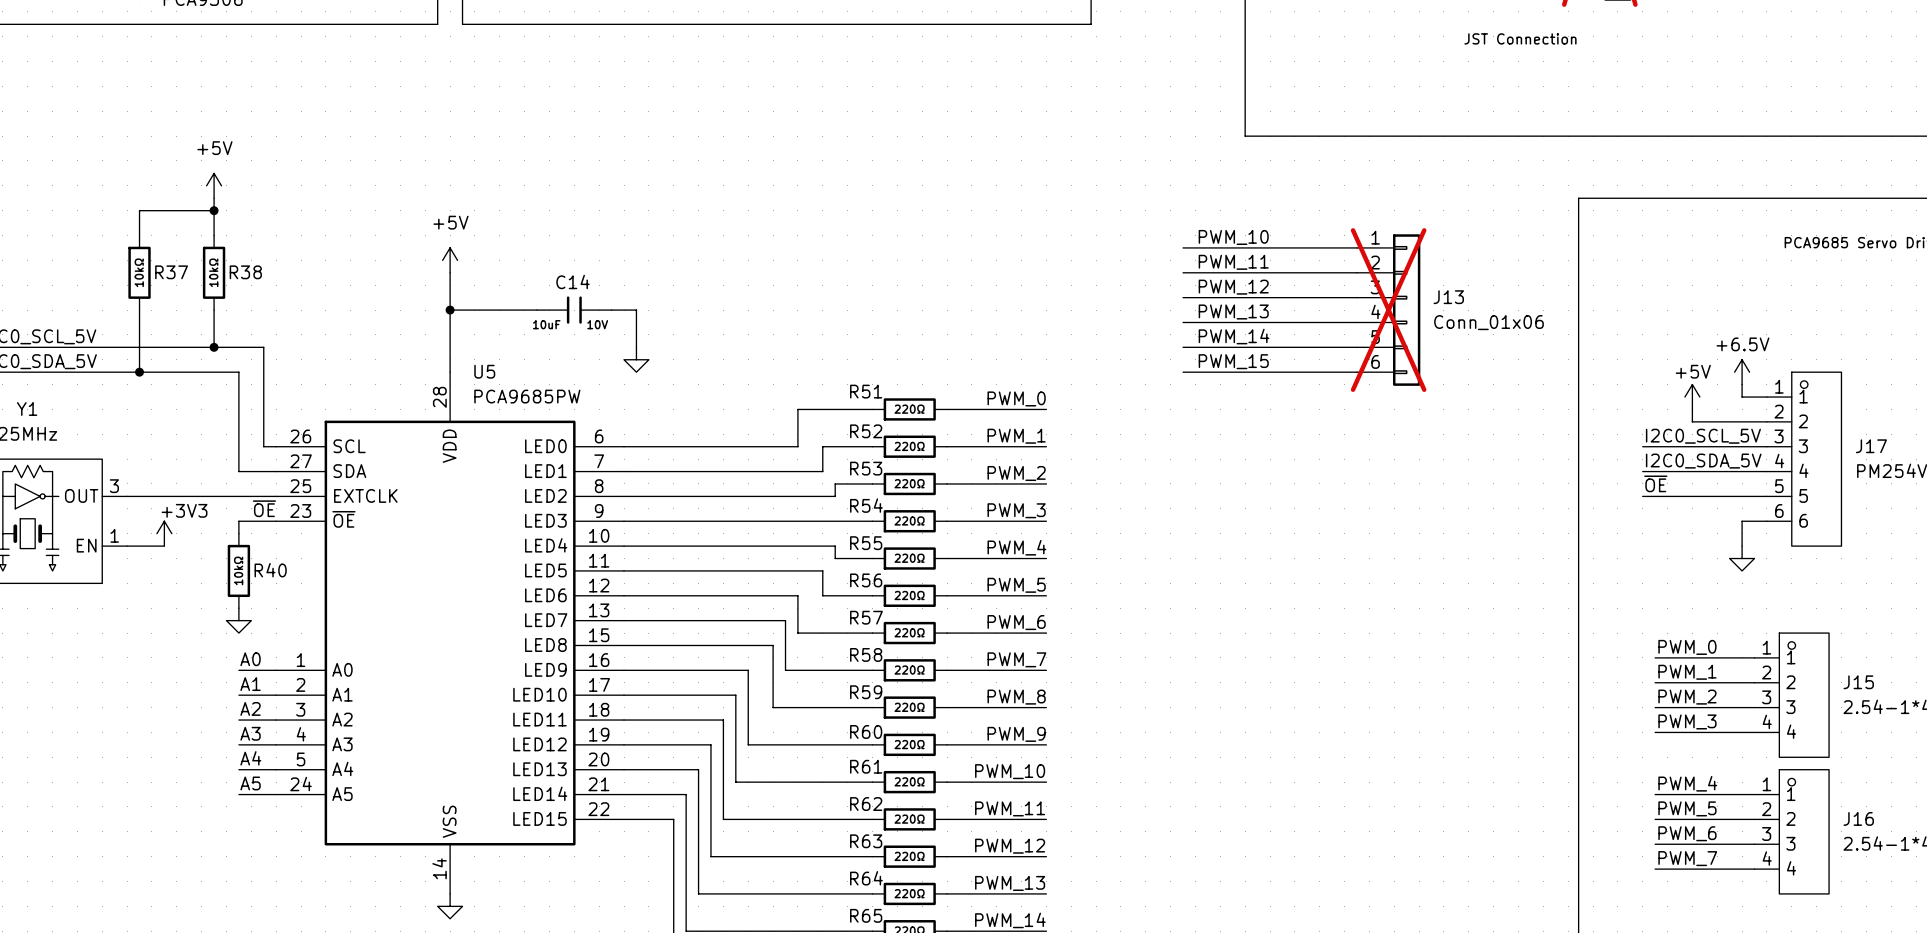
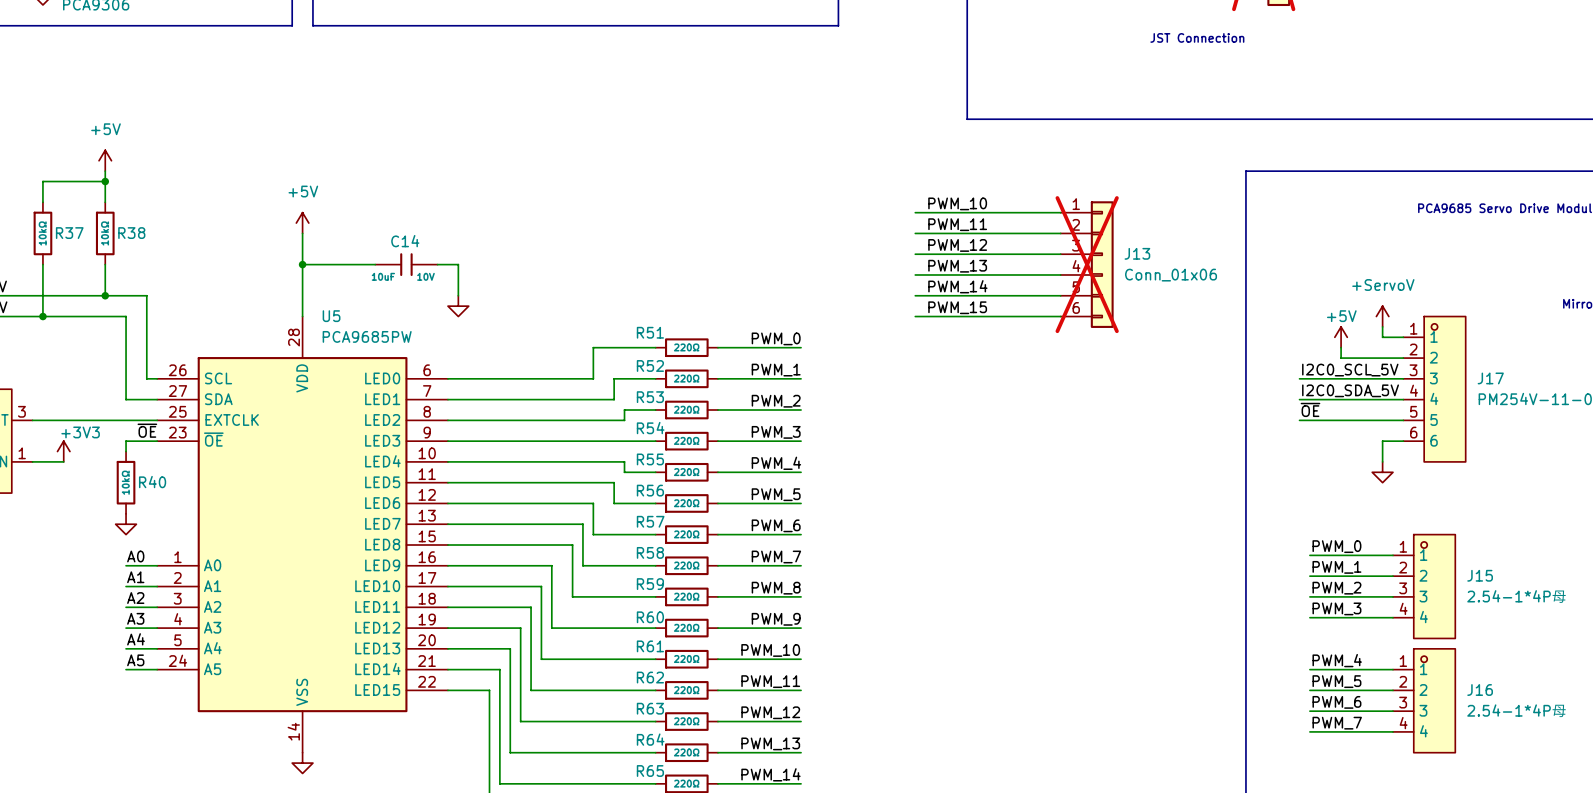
power symbol: +6.5V (1742, 372) -> +ServoV (1382, 316)

